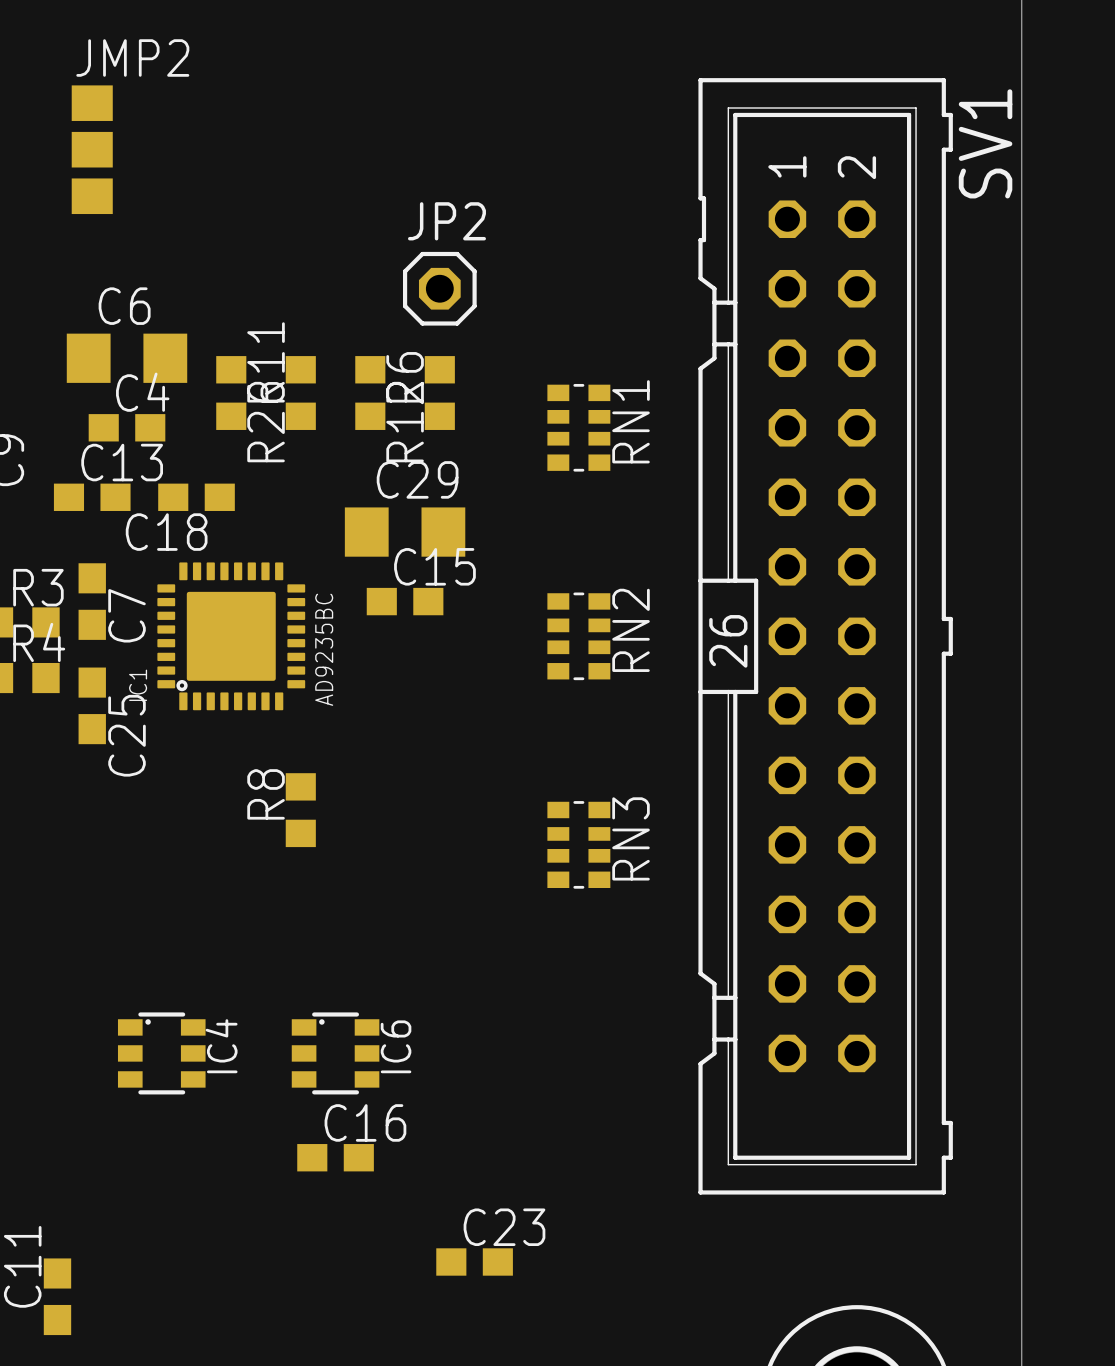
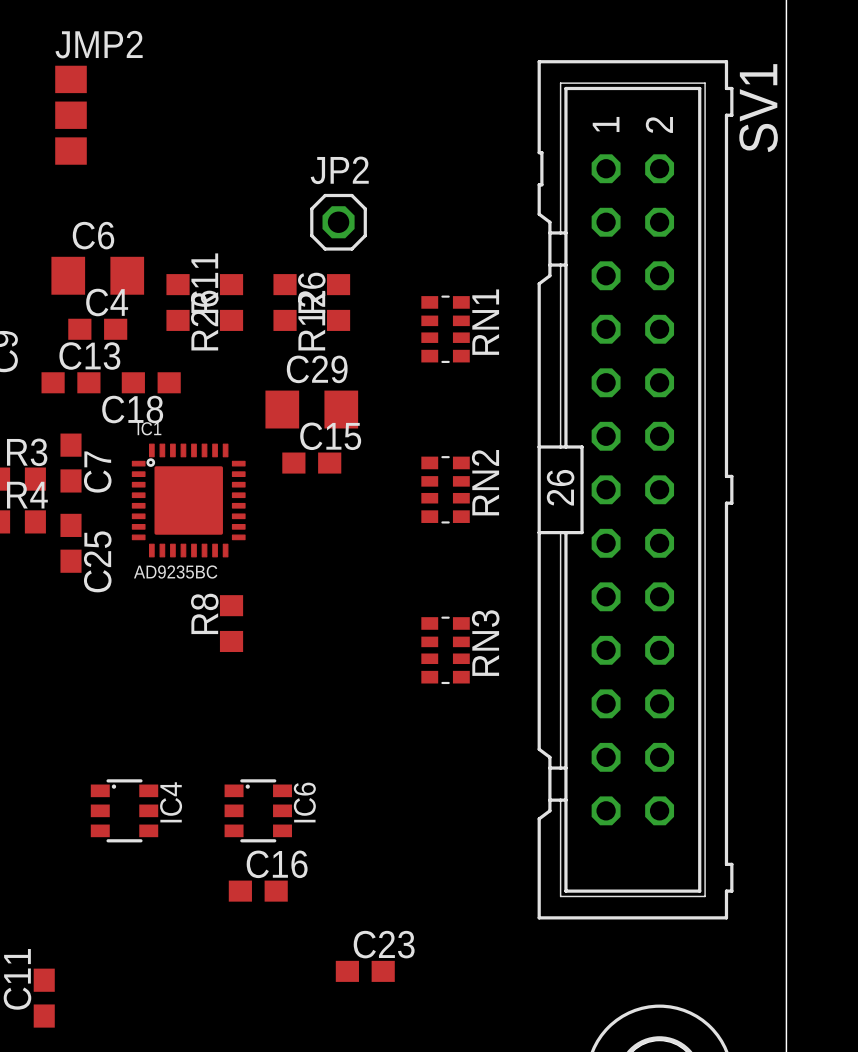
IC1 footprint: [157, 562, 306, 711] -> [131, 443, 246, 558]
IC1 value position: AD9235BC (324, 649) -> AD9235BC (175, 572)
IC1 name position: IC1 (138, 685) -> IC1 (149, 428)

